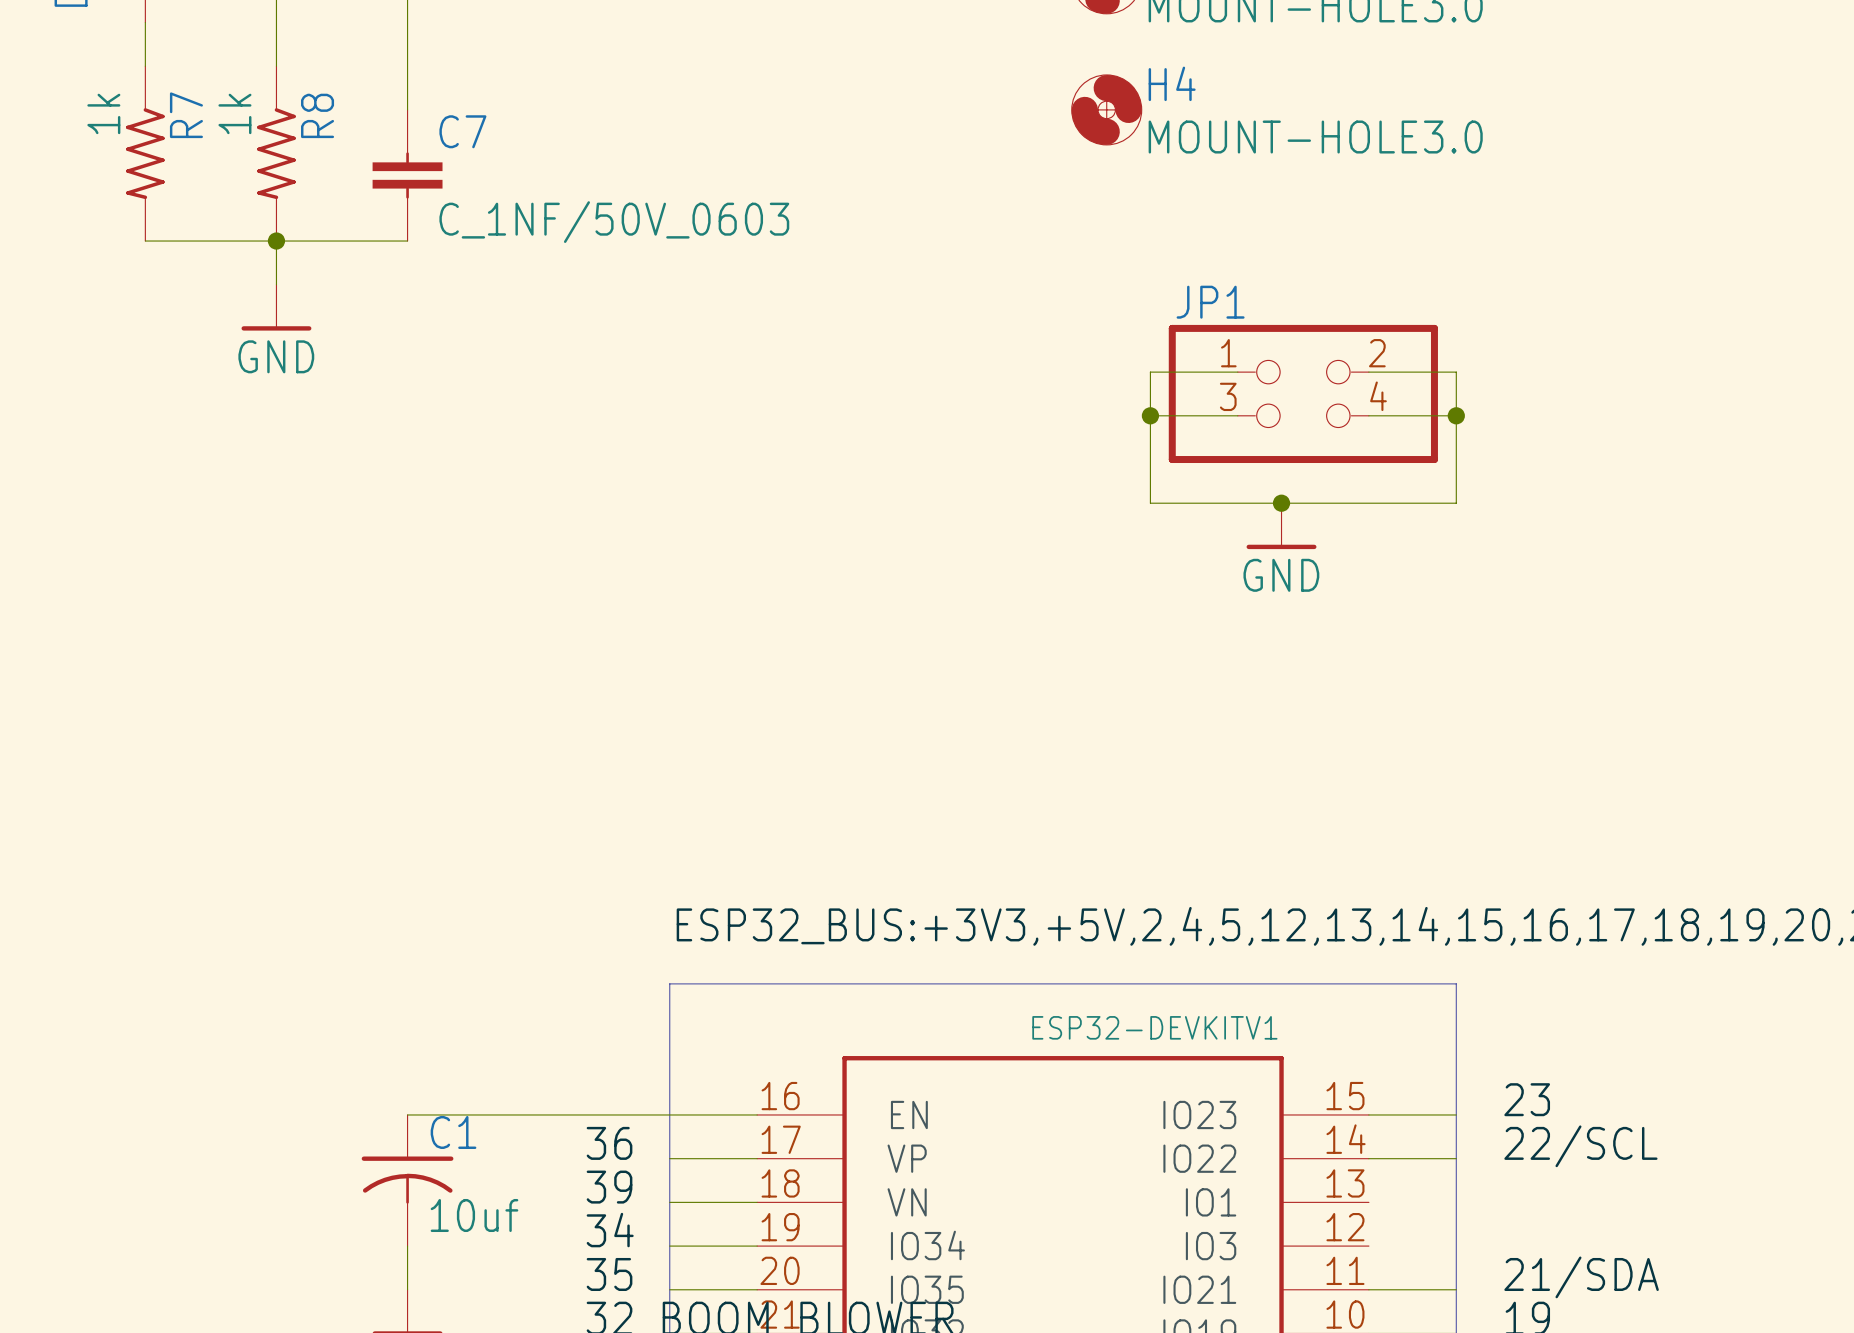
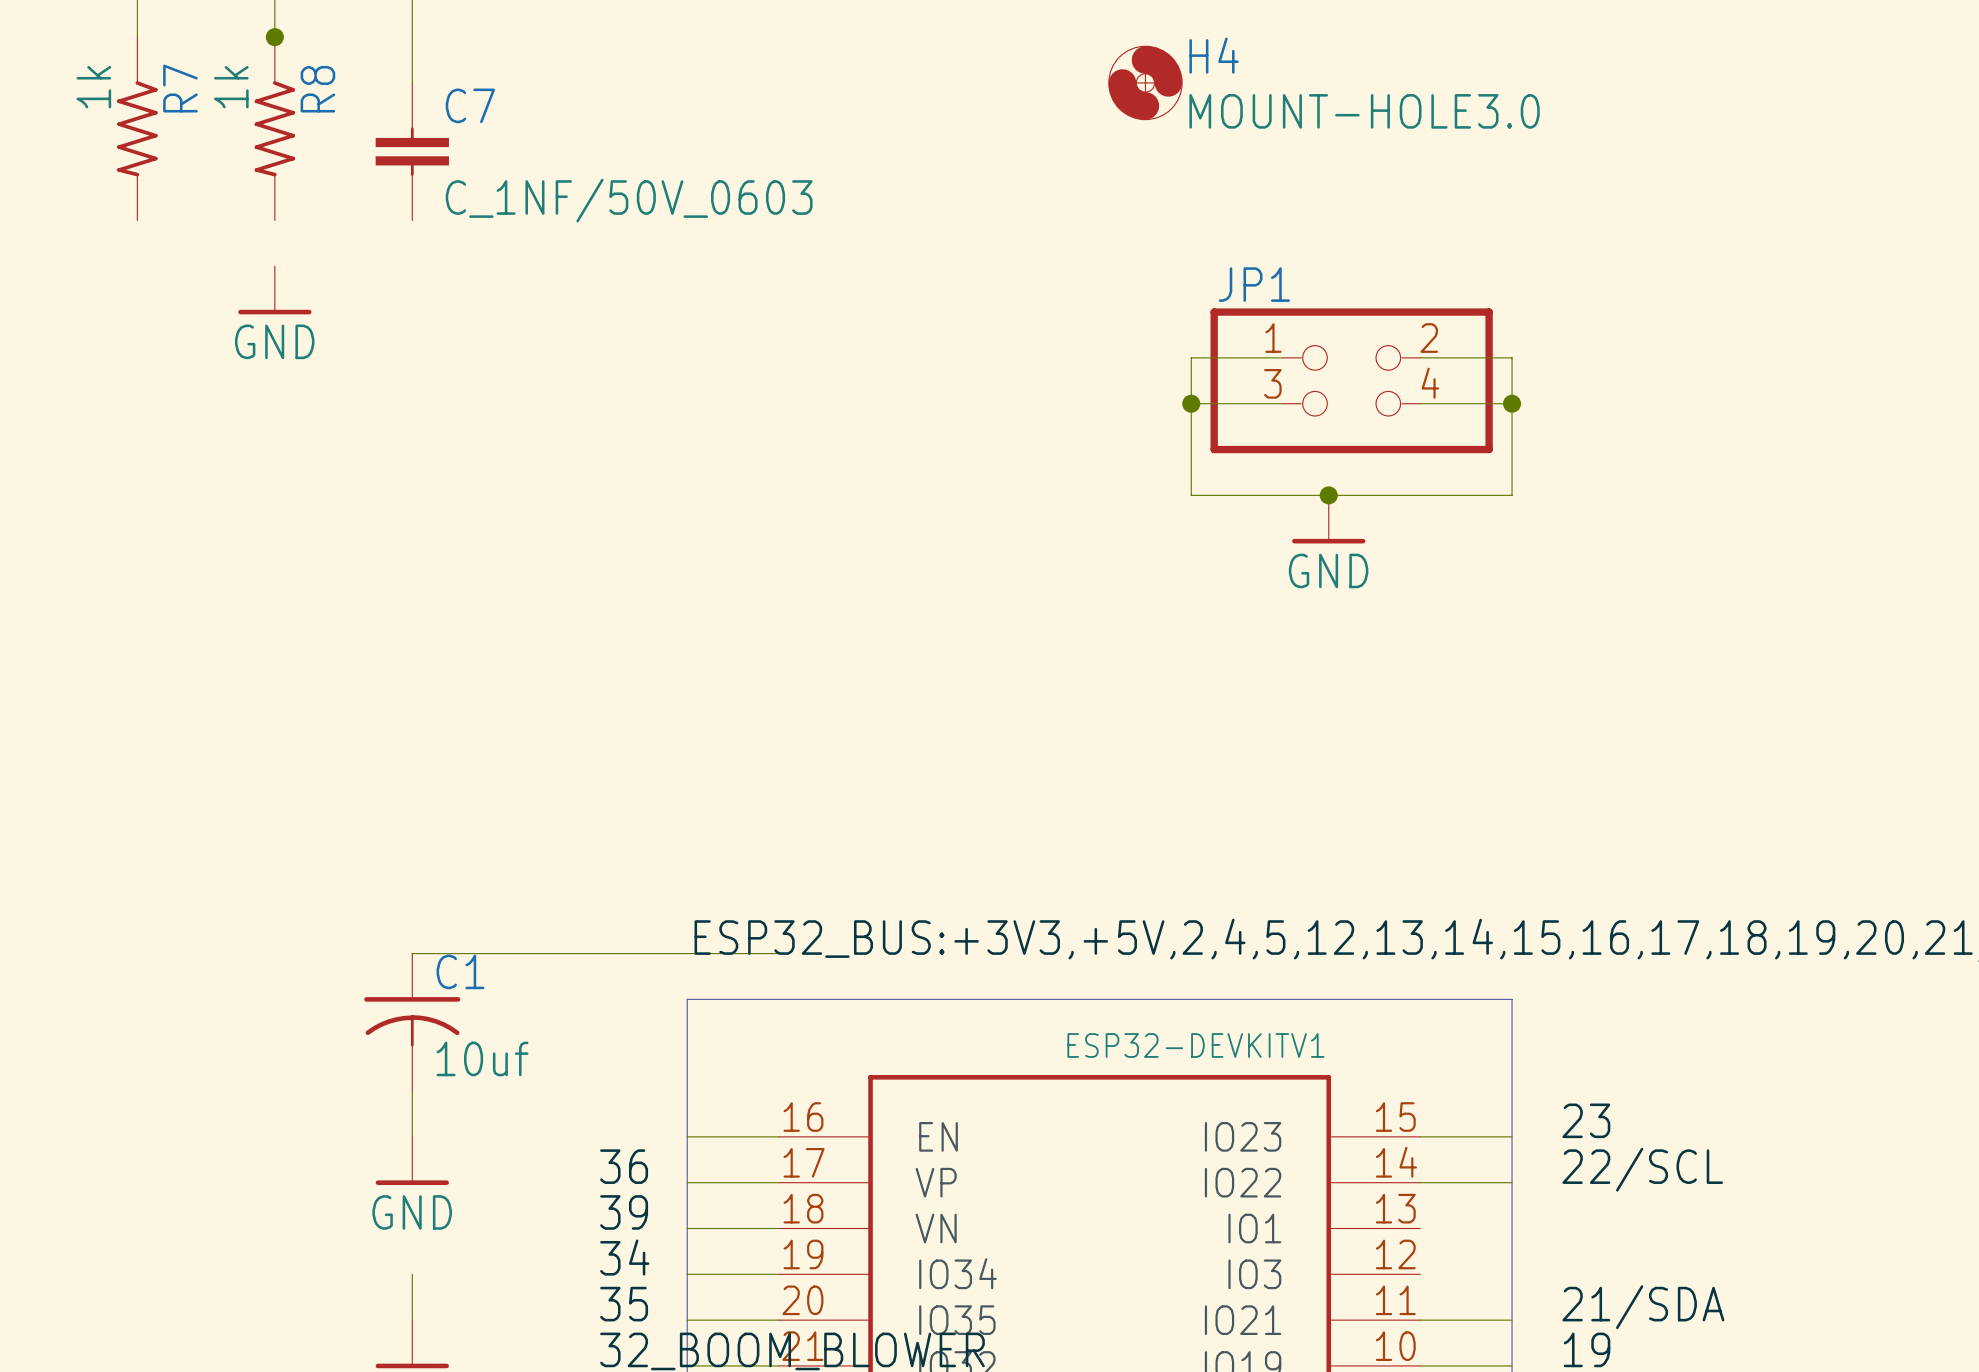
junction: none -> (274, 37)
wire: (145, 241) (407, 241) -> none
wire: (276, 241) (276, 284) -> none
junction: (276, 241) -> none
wire: none -> (412, 953) (778, 953)
wire: (407, 1114) (669, 1114) -> (412, 1136) (412, 1091)
power symbol: none -> GND (412, 1160)
C1 position: (407, 1180) -> (412, 1022)

